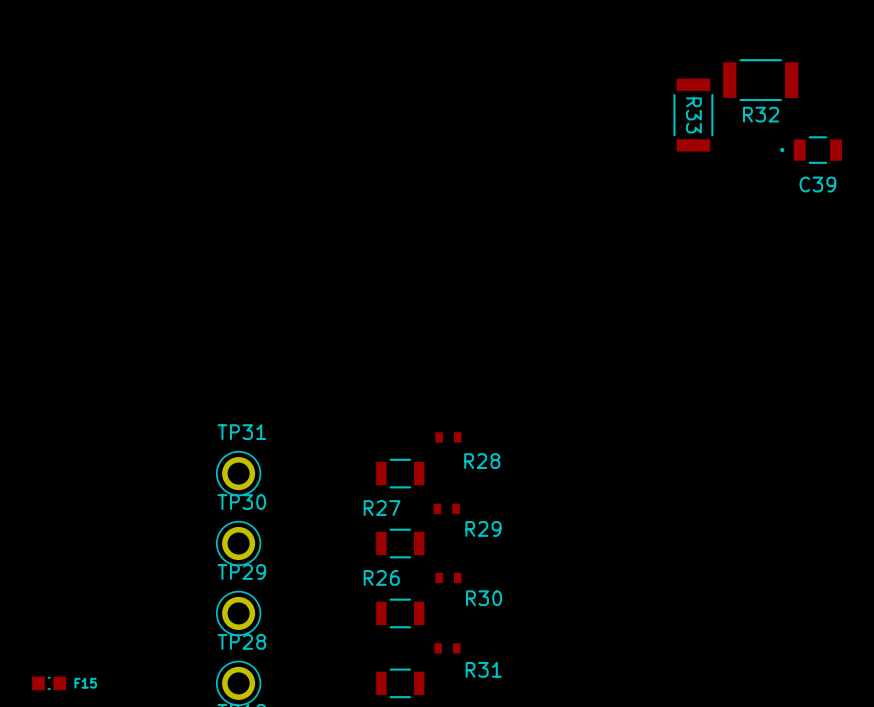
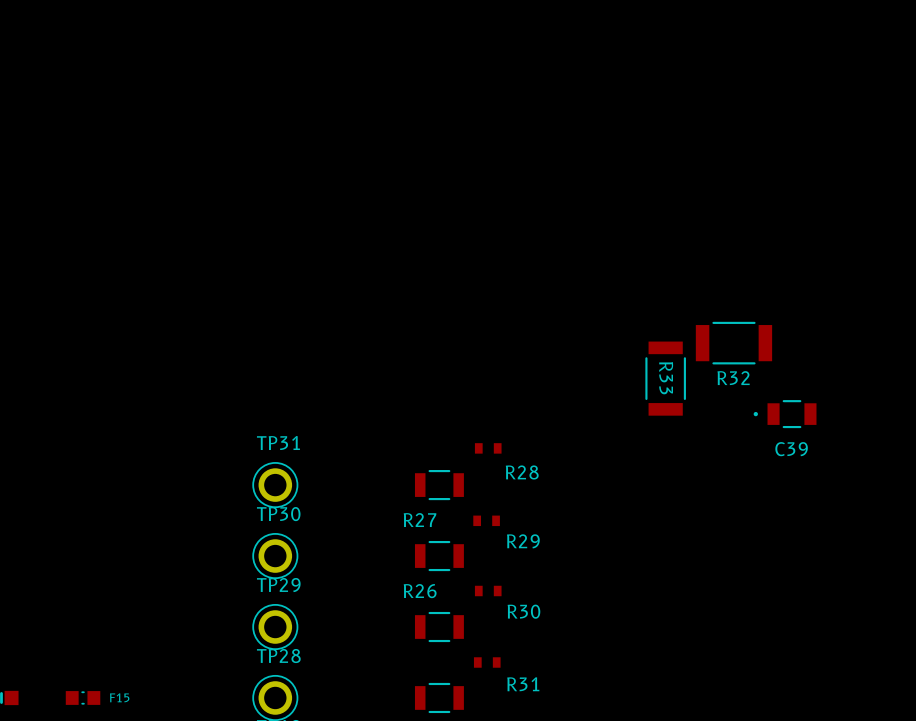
R32 position: (760, 80) -> (733, 343)
R33 position: (693, 115) -> (665, 378)
C39 position: (811, 150) -> (785, 414)

